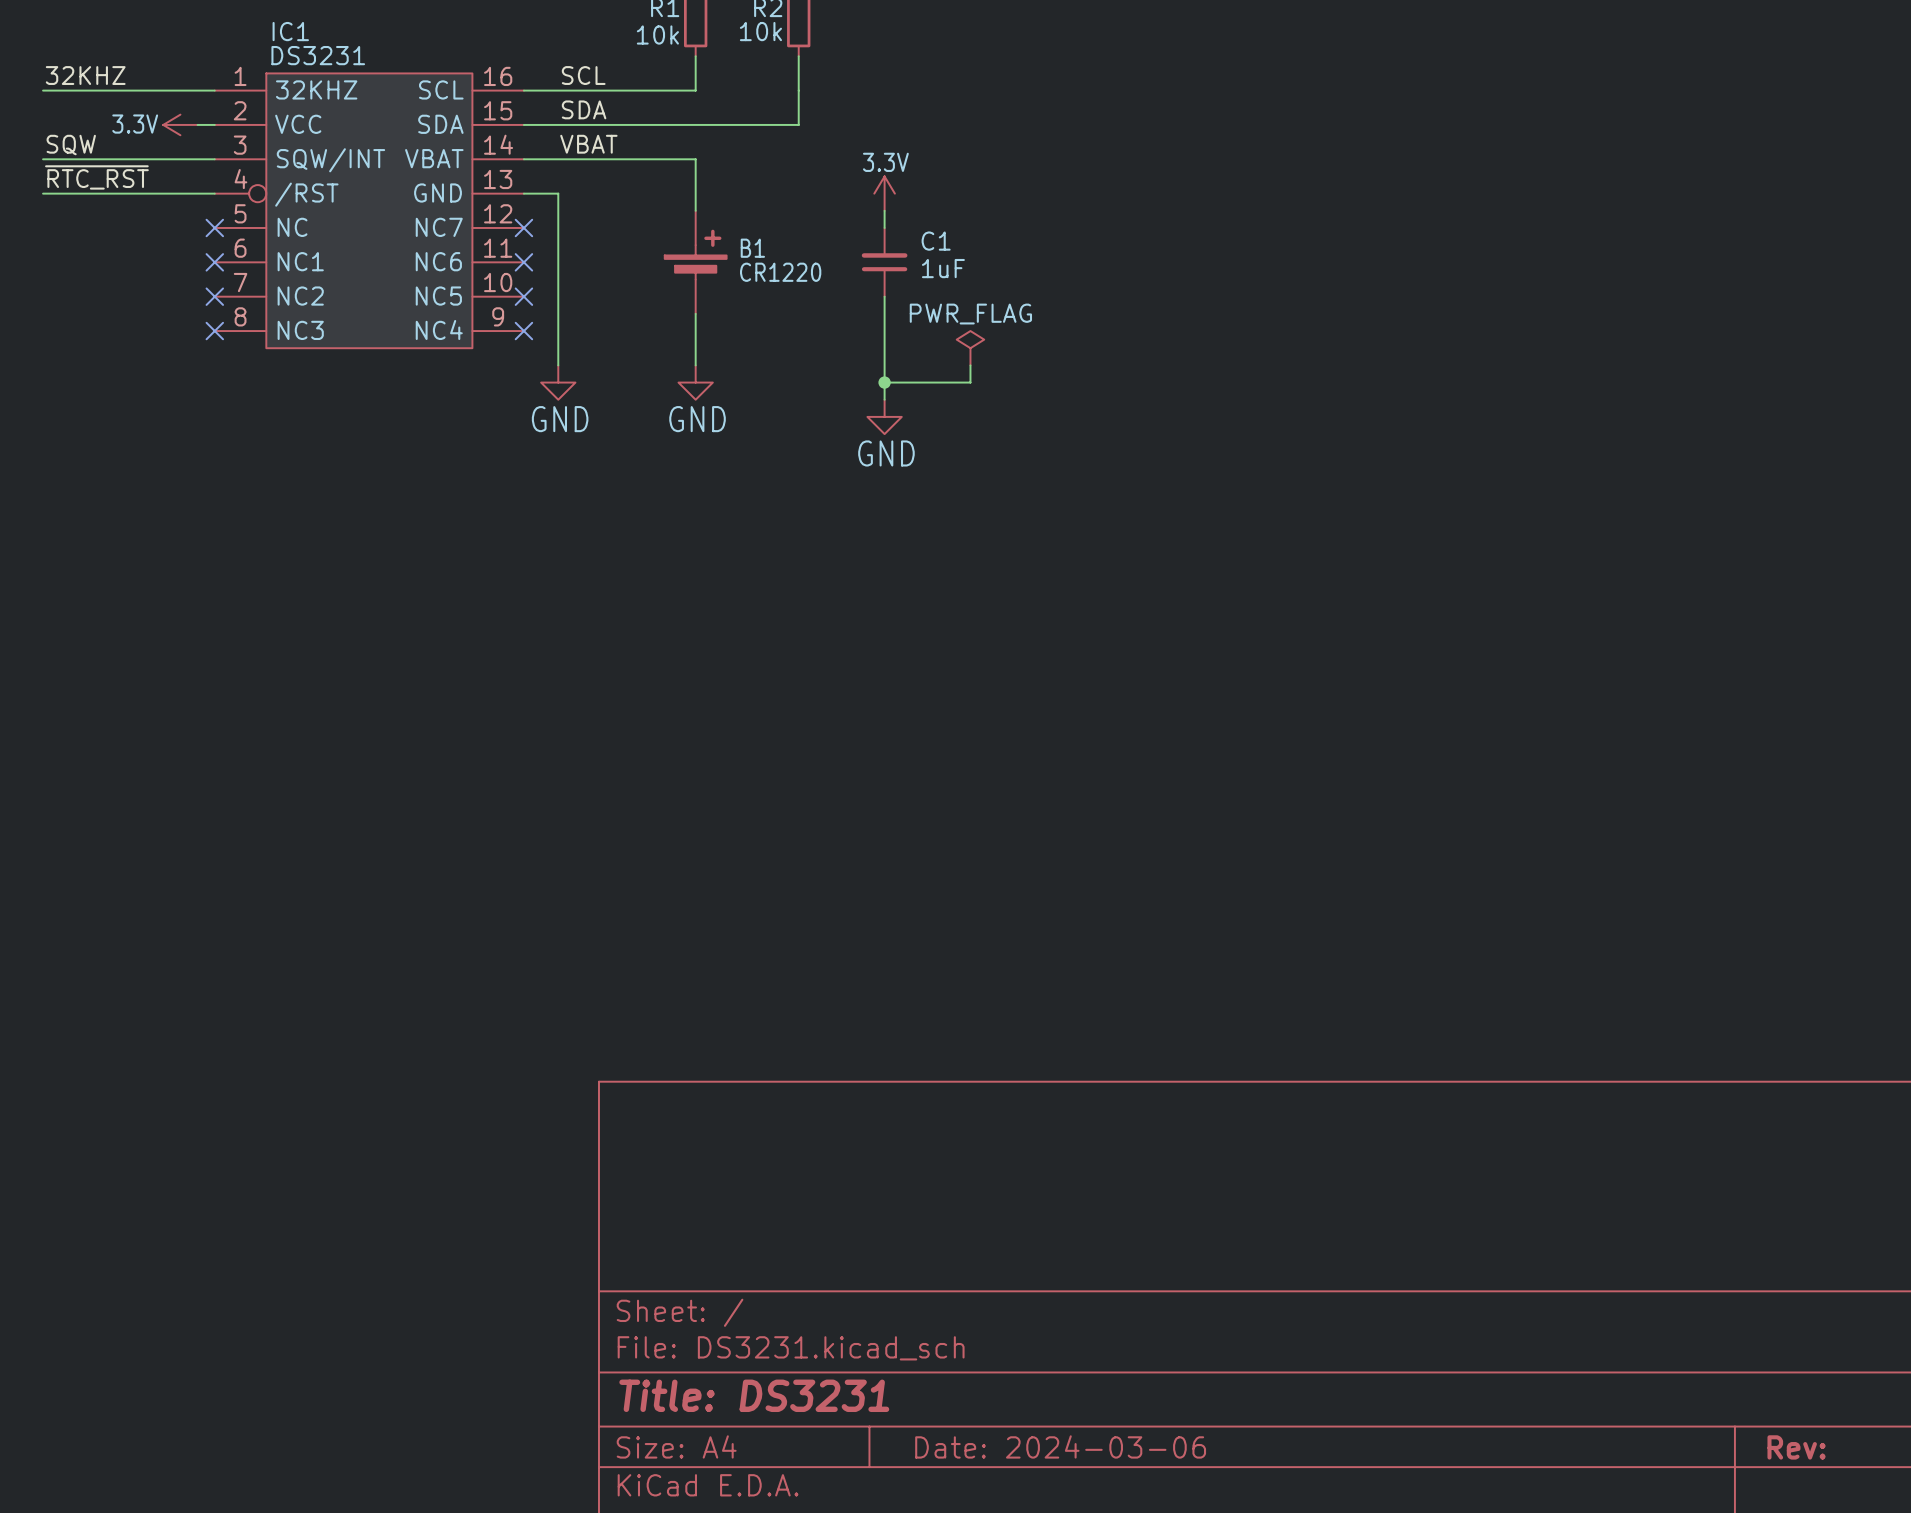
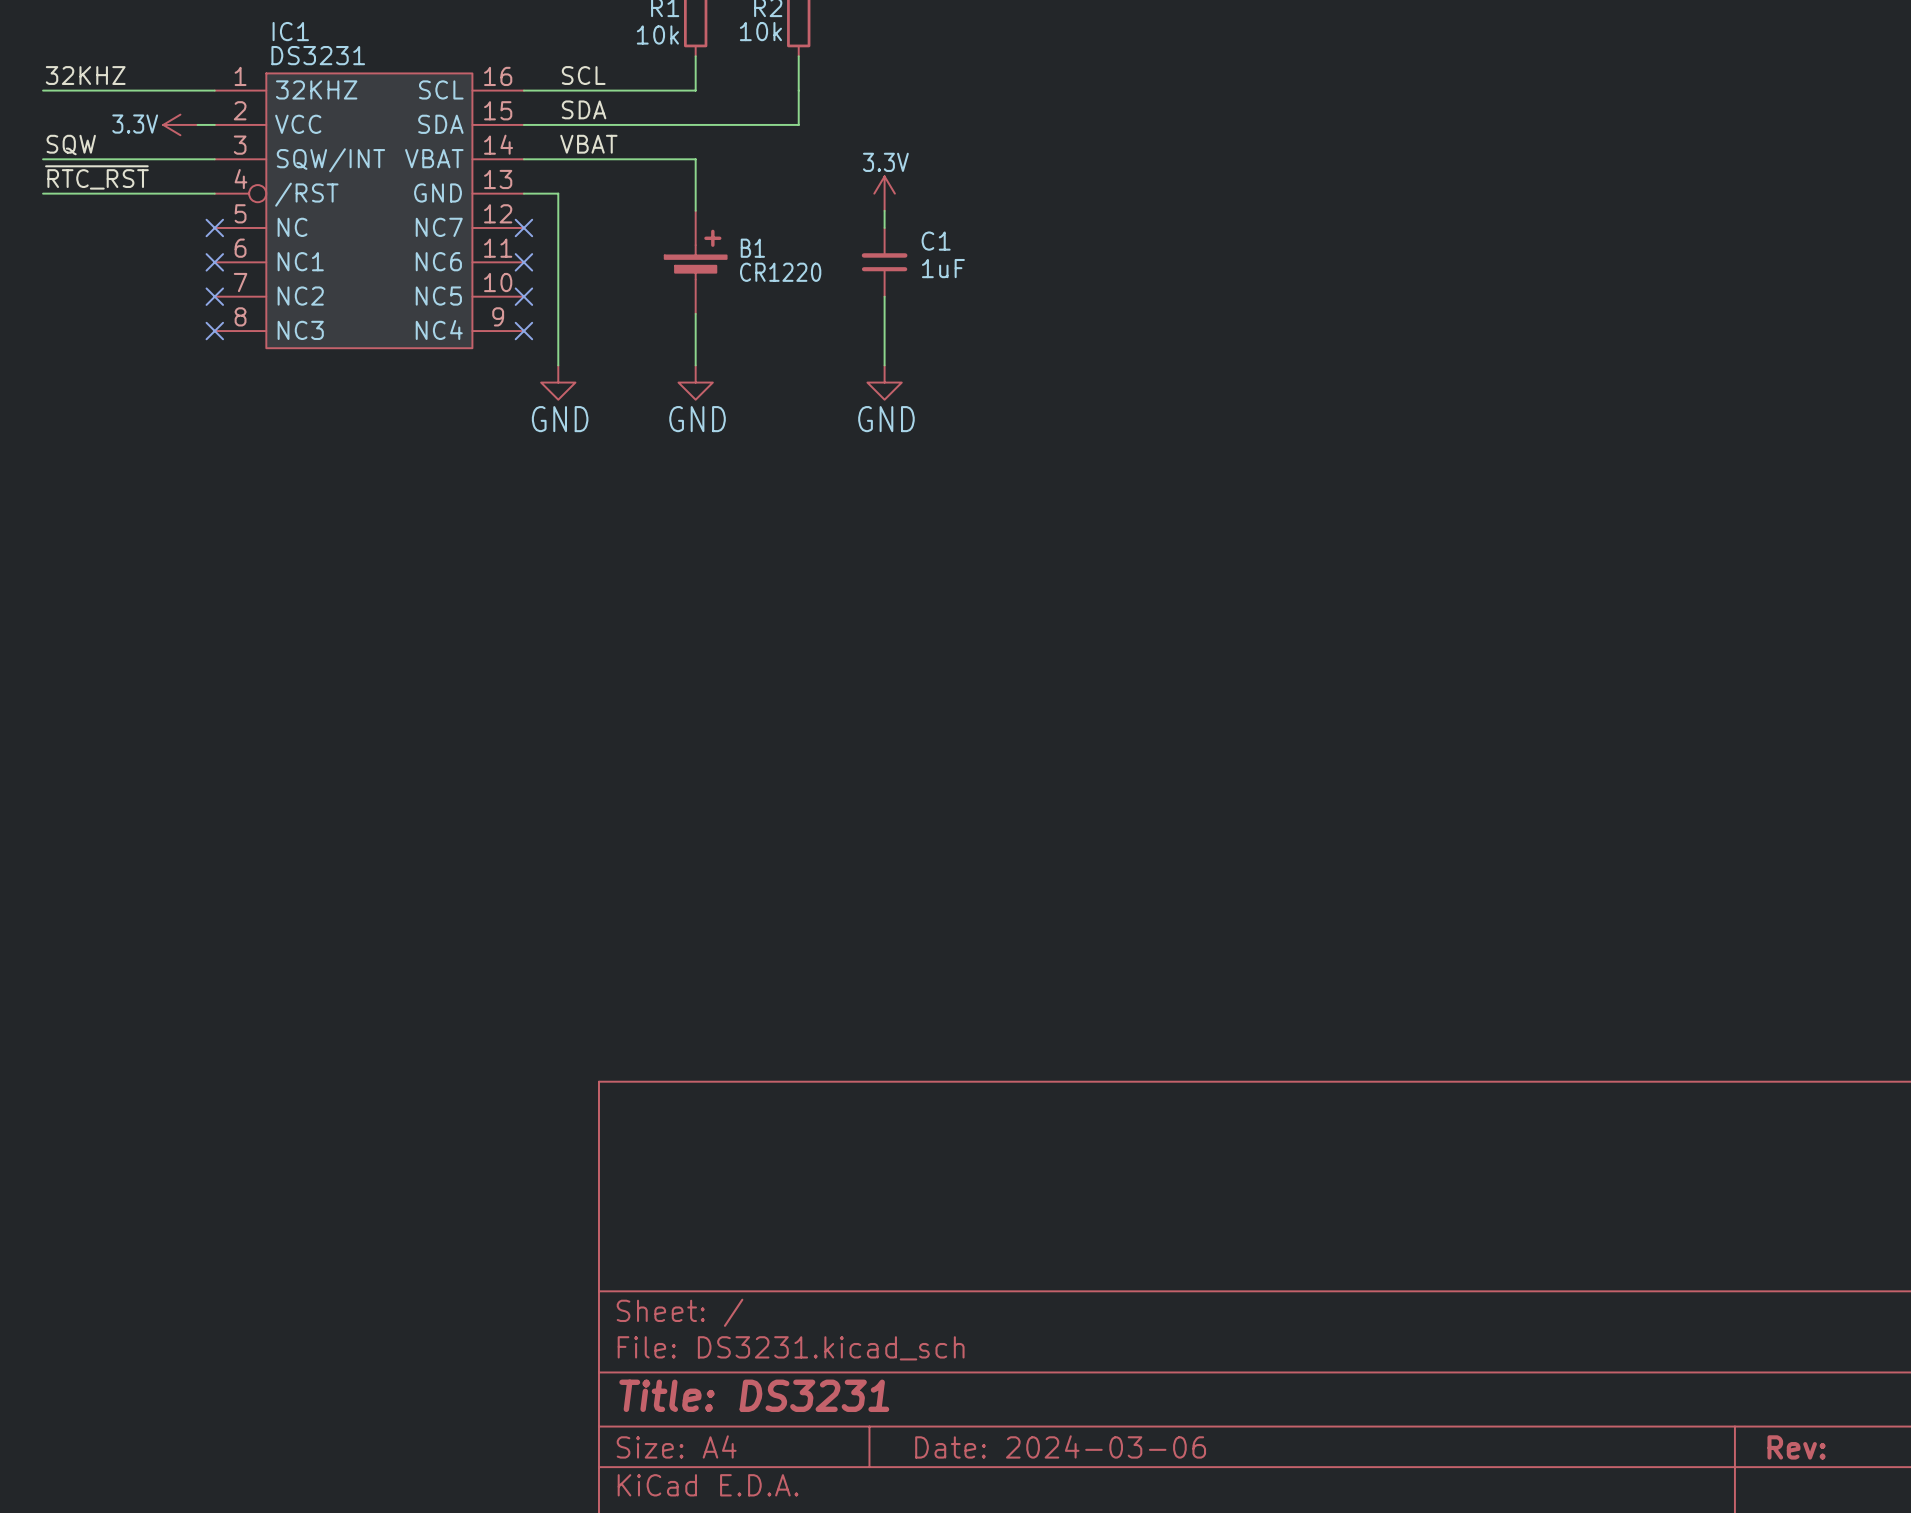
power symbol: PWR_FLAG (970, 348) -> none
wire: (970, 365) (970, 382) (884, 382) -> none
junction: (884, 382) -> none
power symbol position: GND (884, 416) -> GND (884, 382)

